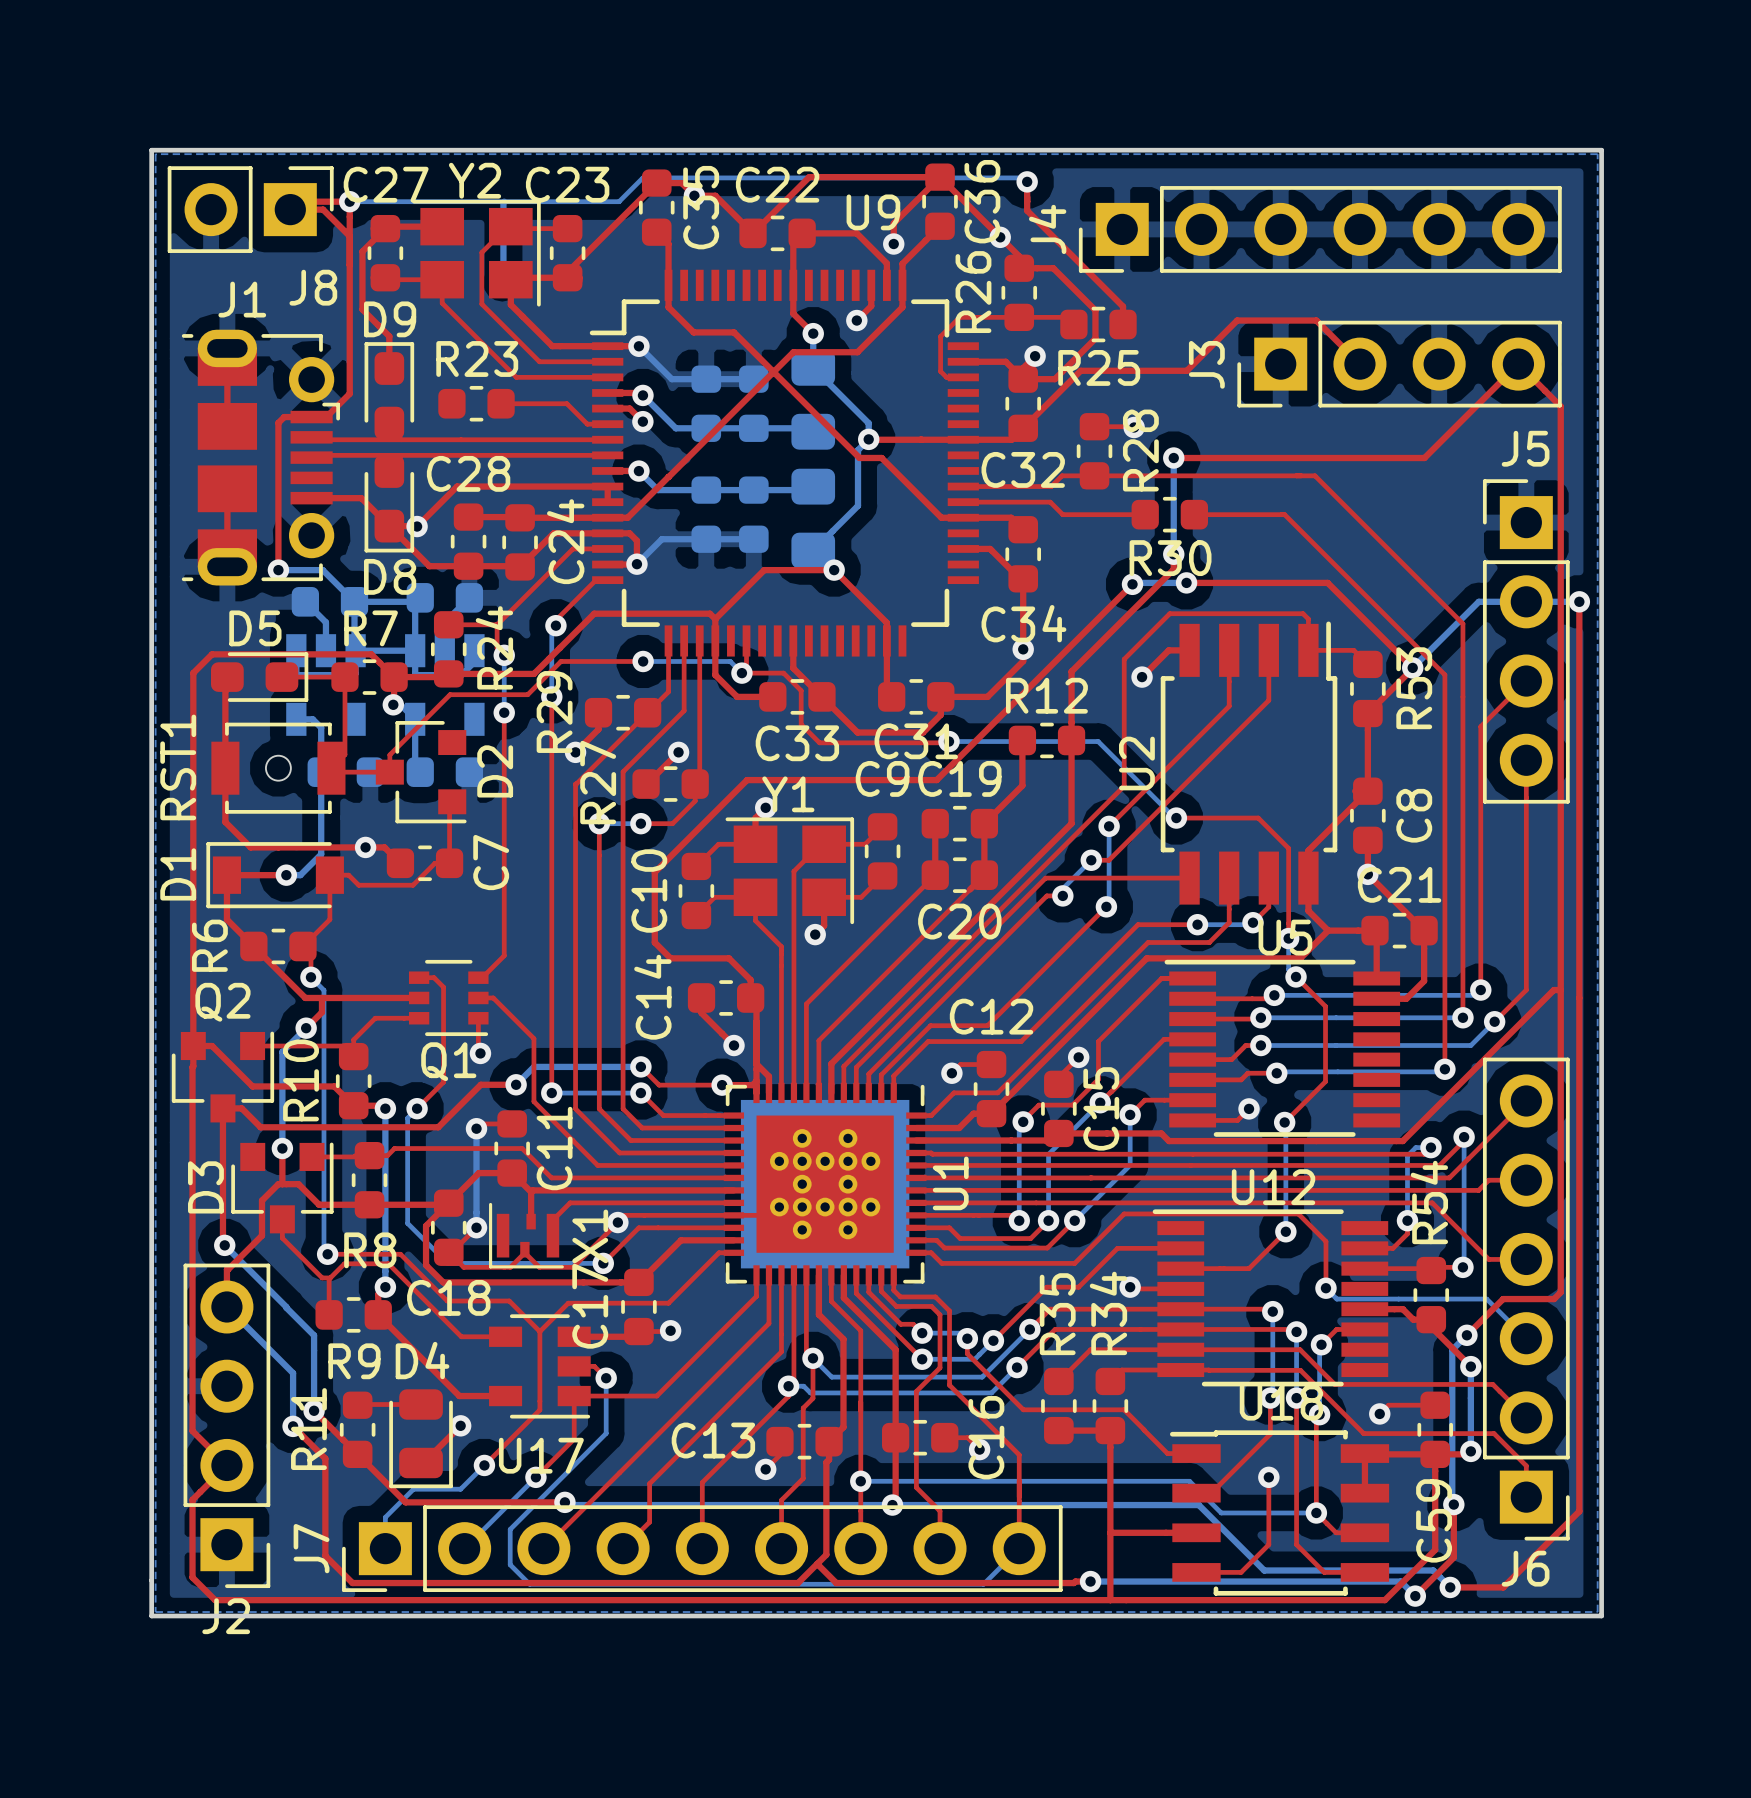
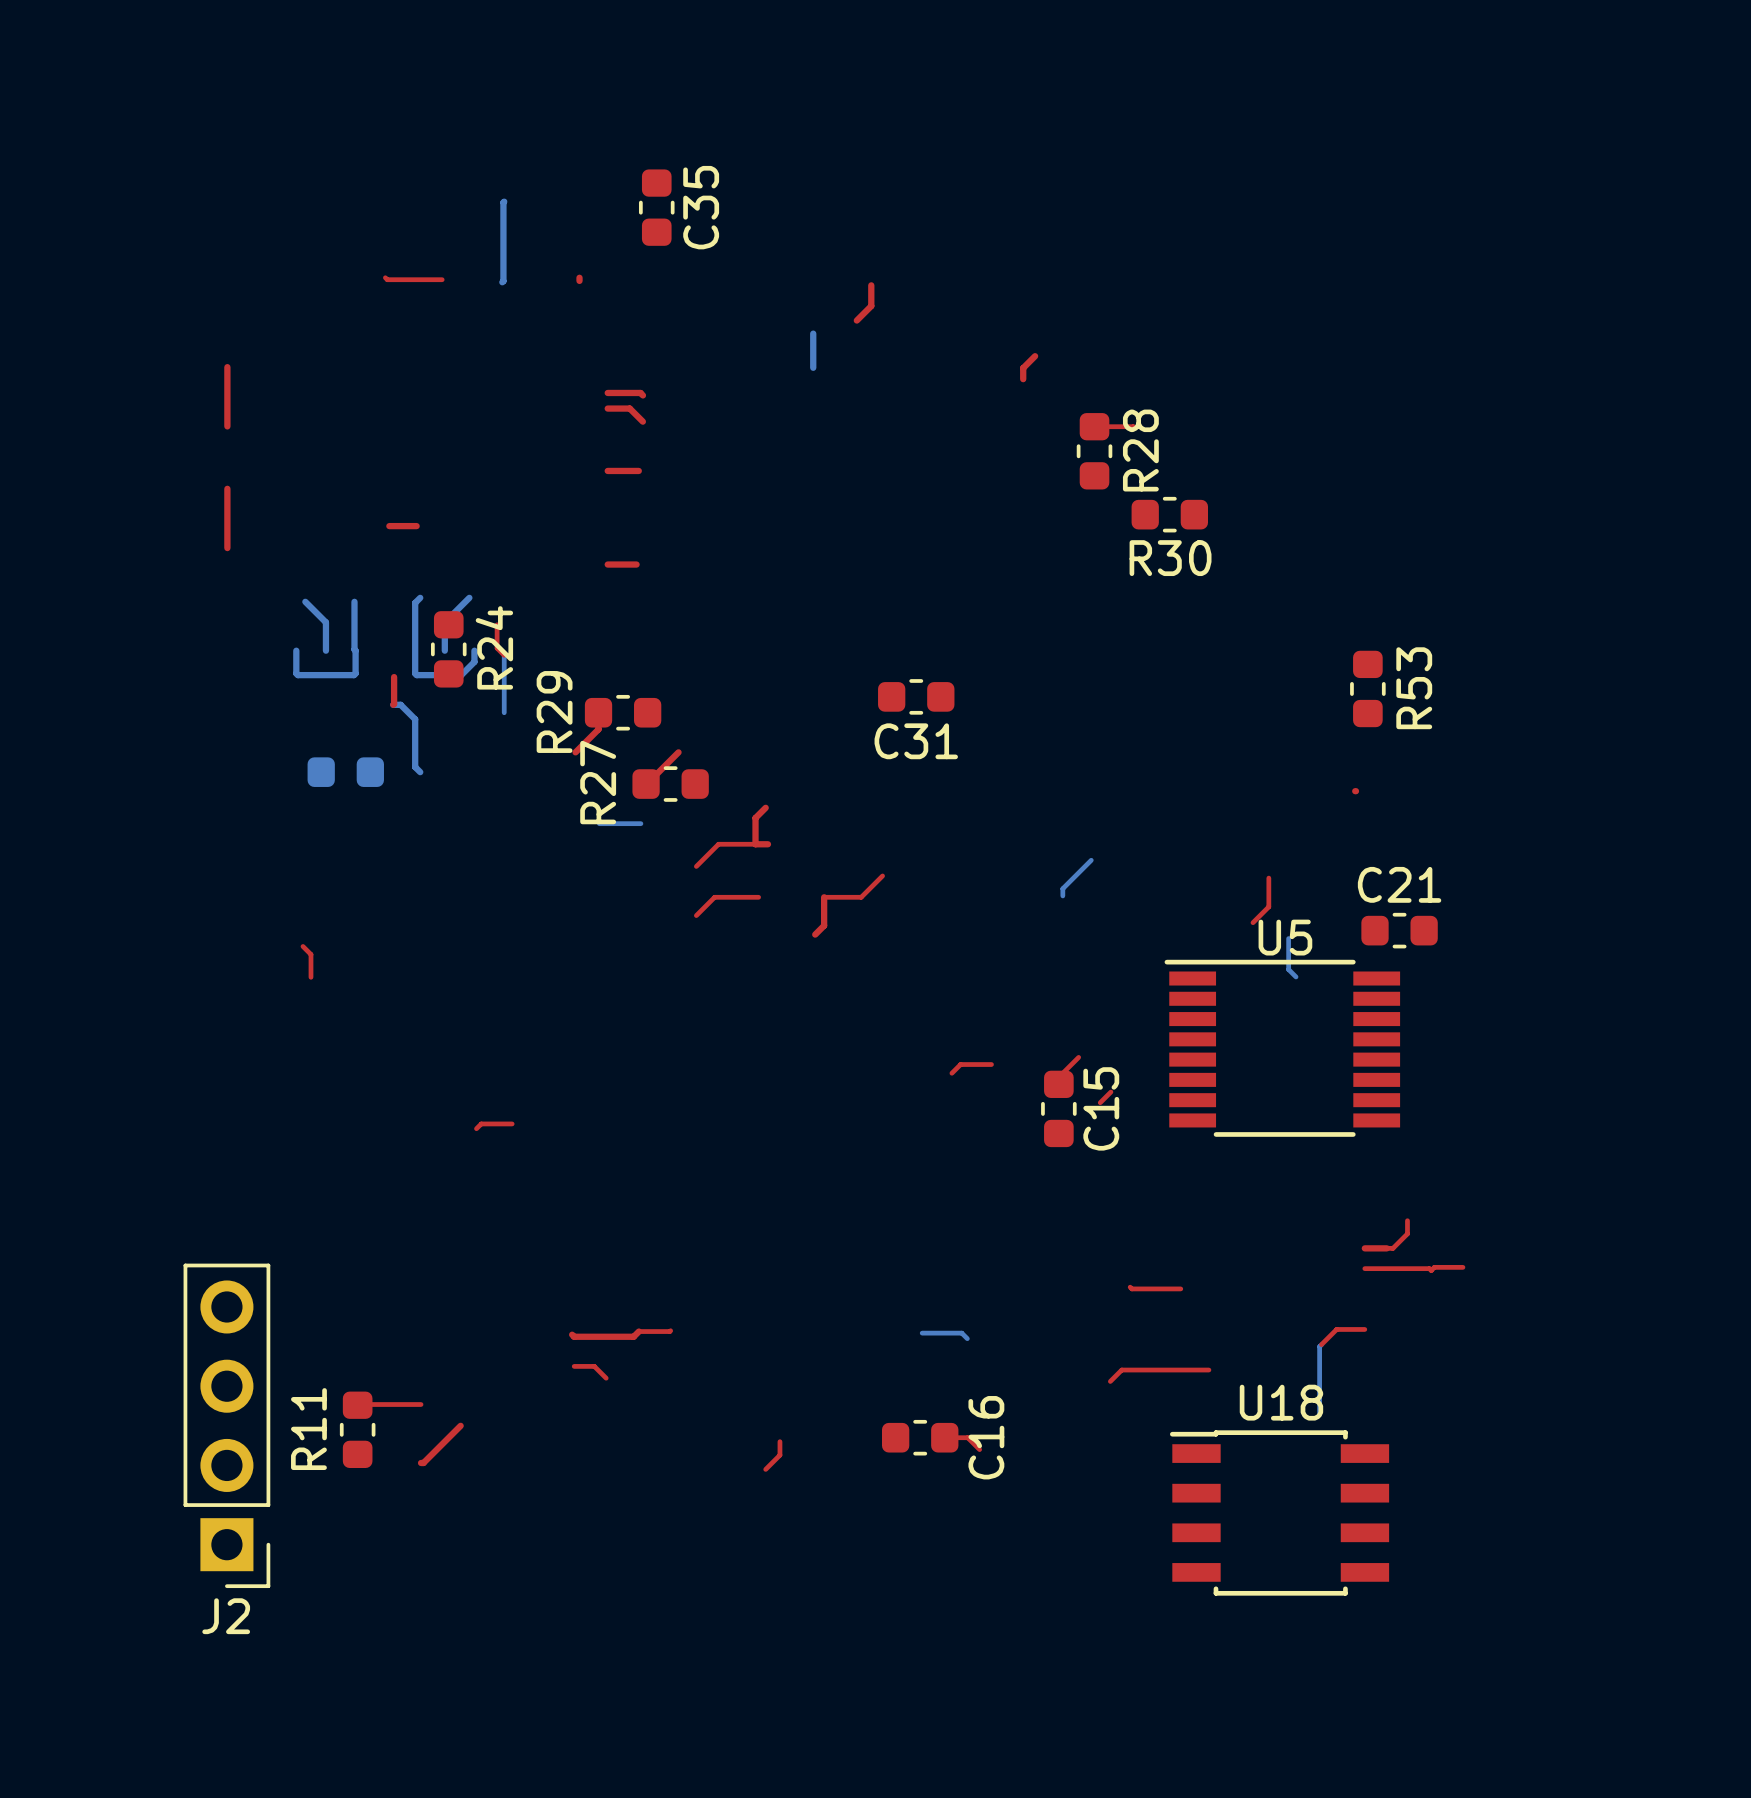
board edge: (151, 150) (1601, 150) (1601, 1615) (151, 1615) (151, 150) -> none
bottom zone outline: (155, 154) (155, 1612) (1597, 1612) (1597, 154) (155, 154) -> none
top track: (940, 177) (809, 177) (753, 233) (715, 195) (694, 195) (681, 183) (656, 183) (567, 272) (567, 277) (512, 277) (510, 279) (510, 304) (552, 346) (638, 346) -> none
top track: (940, 177) (893, 223) (893, 244) -> none
top track: (940, 177) (1019, 256) (1019, 268) (1053, 268) (1095, 310) (1095, 338) (1054, 379) (1023, 379) (1005, 361) (963, 361) -> none
top track: (1027, 181) (1027, 210) (1123, 306) (1123, 324) -> none
bottom track: (1027, 181) (1023, 177) (642, 177) (619, 201) (349, 201) -> none
via: (1027, 181) -> none
via: (694, 195) -> none
via: (349, 201) -> none
C36: (940, 201) -> none
J8: (250, 209) -> none
top track: (442, 226) (387, 226) (362, 251) (362, 309) (389, 336) (389, 368) -> none
top track: (940, 226) (902, 263) (902, 307) (857, 352) (793, 352) (668, 476) -> none
top track: (567, 228) (512, 228) (507, 226) (481, 252) (481, 304) (539, 361) (607, 361) -> none
J4: (1320, 229) -> none
top track: (656, 232) (668, 243) (668, 307) (693, 332) (734, 332) (859, 457) (881, 457) (941, 517) (1011, 517) (1023, 529) -> none
C22: (777, 233) -> none
top track: (349, 236) (323, 209) (290, 209) (298, 201) (349, 201) (349, 393) (326, 417) (284, 417) (278, 422) (278, 570) -> none
via: (1000, 237) -> none
via: (893, 244) -> none
C27: (385, 253) -> none
Y2: (476, 253) -> none
C23: (567, 253) -> none
top track: (440, 277) (442, 279) (442, 303) (516, 377) (607, 377) -> none
top track: (886, 285) (886, 263) (856, 233) (802, 233) (793, 242) (793, 313) (813, 333) -> none
R26: (1019, 292) -> none
via: (856, 320) -> none
top track: (1073, 324) (1066, 317) (959, 317) (940, 336) (940, 371) (946, 377) (963, 377) -> none
R25: (1098, 324) -> none
via: (813, 333) -> none
bottom track: (638, 346) (671, 379) (753, 379) -> none
via: (638, 346) -> none
via: (1035, 356) -> none
bottom track: (817, 363) (813, 367) (868, 423) (868, 439) (858, 450) (858, 505) (813, 550) (834, 570) -> none
top track: (1359, 364) (1316, 320) (1237, 320) (1186, 370) (1080, 370) (1011, 439) (869, 439) -> none
J3: (1399, 364) -> none
D9: (389, 390) -> none
bottom track: (642, 395) (675, 428) (809, 428) (813, 431) -> none
via: (642, 395) -> none
part: (813, 399) -> none
R23: (476, 403) -> none
top track: (501, 403) (566, 403) (587, 424) (607, 424) -> none
part: (706, 403) -> none
part: (753, 403) -> none
C32: (1023, 403) -> none
via: (642, 421) -> none
via: (1134, 427) -> none
top track: (327, 437) (329, 439) (607, 439) -> none
via: (868, 439) -> none
top track: (607, 455) (329, 455) (327, 457) -> none
J1: (260, 457) -> none
top track: (1173, 458) (1424, 458) (1518, 364) (1560, 406) (1560, 1292) (1554, 1299) (1503, 1299) (1466, 1335) -> none
bottom track: (1173, 458) (1173, 554) -> none
via: (1173, 458) -> none
U9: (784, 463) -> none
bottom track: (638, 471) (657, 490) (809, 490) (813, 486) -> none
via: (638, 471) -> none
top track: (668, 476) (627, 517) (607, 517) -> none
top track: (963, 486) (1051, 486) (1062, 475) (1315, 475) (1462, 623) (1462, 1017) -> none
top track: (311, 498) (361, 498) (429, 566) (530, 566) -> none
top track: (607, 502) (607, 486) (457, 486) (417, 526) -> none
top track: (963, 502) (1050, 502) (1062, 514) (1145, 514) -> none
D8: (389, 503) -> none
part: (706, 514) -> none
part: (753, 514) -> none
top track: (1194, 514) (1284, 514) (1444, 674) (1444, 1069) -> none
top track: (480, 517) (595, 517) -> none
part: (813, 518) -> none
via: (417, 526) -> none
bottom track: (753, 539) (661, 539) (636, 564) -> none
C28: (468, 541) -> none
C24: (520, 542) -> none
top track: (607, 548) (572, 548) (497, 624) (448, 624) -> none
top track: (963, 548) (990, 548) (1020, 578) (1023, 578) (1023, 661) (987, 696) (940, 696) (940, 714) (923, 732) (857, 732) (793, 668) (793, 640) -> none
C34: (1023, 554) -> none
top track: (1173, 554) (1173, 569) (1071, 671) (1071, 823) (831, 1063) (831, 1092) -> none
via: (1173, 554) -> none
top track: (636, 564) (636, 540) (629, 533) (553, 533) (520, 566) -> none
via: (636, 564) -> none
bottom track: (278, 570) (322, 570) (354, 601) (416, 601) -> none
via: (278, 570) -> none
via: (834, 570) -> none
top track: (607, 580) (596, 580) (555, 620) (555, 625) -> none
top track: (1186, 582) (1327, 582) (1412, 667) (1367, 713) (1367, 791) (1308, 850) (1308, 910) (1328, 930) -> none
bottom track: (1186, 582) (1132, 584) -> none
via: (1186, 582) -> none
top track: (1132, 584) (936, 780) (747, 780) (654, 872) (654, 942) (670, 958) (728, 958) (750, 980) (750, 997) -> none
via: (1132, 584) -> none
part: (444, 597) -> none
part: (329, 601) -> none
top track: (1579, 601) (1579, 1511) (1503, 1587) (1450, 1587) -> none
bottom track: (1579, 601) (1478, 601) (1412, 667) -> none
via: (1579, 601) -> none
top track: (715, 619) (709, 613) (594, 613) (534, 673) (448, 673) (445, 677) (394, 677) (371, 654) (212, 654) (193, 673) (192, 1431) (226, 1465) -> none
top track: (715, 619) (764, 570) (834, 570) (886, 622) (886, 692) (891, 696) -> none
top track: (715, 619) (715, 675) (737, 696) (772, 696) -> none
bottom track: (555, 625) (551, 629) (551, 696) -> none
via: (555, 625) -> none
top track: (668, 640) (668, 691) (575, 784) (575, 1108) (619, 1152) (733, 1152) -> none
top track: (684, 640) (684, 710) (623, 771) (623, 1108) (642, 1128) (733, 1128) -> none
top track: (699, 640) (699, 779) (695, 784) (695, 801) (672, 823) (640, 823) -> none
top track: (746, 640) (746, 668) (741, 673) (783, 673) (801, 690) (801, 724) (819, 742) (949, 741) -> none
J5: (1526, 641) -> none
via: (1023, 649) -> none
bottom track: (355, 650) (415, 650) -> none
top track: (1189, 650) (1168, 650) (1142, 677) -> none
top track: (1229, 650) (1229, 706) (1109, 826) -> none
top track: (1269, 651) (1268, 700) (1108, 860) (1091, 860) -> none
via: (504, 655) -> none
top track: (643, 661) (560, 661) (527, 694) (450, 694) (389, 754) (389, 772) (335, 772) (331, 768) (344, 754) (344, 677) (282, 677) -> none
bottom track: (643, 661) (730, 661) (741, 673) -> none
via: (643, 661) -> none
top track: (1367, 664) (1353, 650) (1308, 650) (1308, 619) (1303, 613) (1169, 613) (1124, 659) (1124, 786) (843, 1066) (843, 1092) -> none
via: (1412, 667) -> none
via: (741, 673) -> none
D5: (259, 677) -> none
R7: (369, 677) -> none
via: (1142, 677) -> none
top track: (1526, 681) (1480, 726) (1480, 990) -> none
part: (325, 685) -> none
part: (444, 685) -> none
top track: (227, 689) (227, 677) (225, 679) (225, 822) (250, 847) (384, 847) (400, 863) -> none
top track: (551, 696) (551, 1093) -> none
via: (551, 696) -> none
C33: (797, 696) -> none
via: (393, 704) -> none
via: (504, 712) -> none
top track: (502, 714) (504, 712) (504, 955) (482, 977) (478, 977) -> none
bottom track: (296, 719) (312, 719) (321, 727) (321, 854) (300, 875) (286, 875) -> none
top track: (1022, 740) (1022, 785) (984, 823) (984, 877) -> none
R12: (1046, 740) -> none
bottom track: (949, 741) (1098, 741) (1176, 818) -> none
via: (949, 741) -> none
via: (575, 752) -> none
via: (678, 752) -> none
top track: (1526, 760) (1526, 990) (1494, 1021) -> none
U2: (1249, 763) -> none
RST1: (278, 768) -> none
D2: (421, 772) -> none
part: (444, 772) -> none
top track: (452, 801) (449, 804) (449, 863) (434, 863) (413, 885) (358, 885) (348, 875) (329, 875) -> none
via: (765, 807) -> none
C8: (1367, 815) -> none
top track: (1176, 818) (1258, 818) (1288, 848) (1288, 938) -> none
via: (1176, 818) -> none
top track: (599, 823) (599, 1108) (630, 1140) (733, 1140) -> none
via: (599, 823) -> none
via: (640, 823) -> none
top track: (935, 823) (935, 875) (806, 1004) (806, 1092) -> none
C19: (959, 823) -> none
top track: (882, 826) (865, 844) (821, 844) (793, 871) (793, 1092) -> none
bottom track: (1109, 826) (1109, 904) (1106, 906) -> none
via: (1109, 826) -> none
top track: (1367, 840) (1367, 874) (1424, 930) (1424, 981) (1406, 998) (1376, 998) -> none
via: (365, 847) -> none
C9: (882, 851) -> none
via: (1091, 860) -> none
C7: (425, 863) -> none
top track: (329, 870) (329, 919) (302, 946) (310, 946) -> none
Y1: (789, 870) -> none
via: (1367, 874) -> none
D1: (275, 875) -> none
top track: (286, 875) (226, 875) (226, 919) (305, 997) (419, 997) -> none
via: (286, 875) -> none
C20: (959, 875) -> none
top track: (984, 875) (818, 1040) (818, 1092) -> none
top track: (1189, 878) (1045, 878) (856, 1067) (856, 1092) -> none
top track: (1229, 878) (1229, 922) (1209, 942) (1148, 942) (997, 1092) (953, 1092) (931, 1115) (916, 1115) -> none
C10: (696, 891) -> none
top track: (1062, 895) (1046, 895) (868, 1073) (868, 1092) -> none
via: (1062, 895) -> none
top track: (755, 897) (755, 920) (781, 946) (781, 1092) -> none
top track: (1106, 906) (987, 1025) (930, 1025) (881, 1074) (881, 1092) -> none
via: (1106, 906) -> none
bottom track: (1252, 922) (1251, 924) (1197, 924) -> none
via: (1252, 922) -> none
top track: (1197, 924) (1138, 924) (1021, 1041) (928, 1041) (893, 1075) (893, 1092) -> none
via: (1197, 924) -> none
top track: (1328, 930) (1375, 930) (1376, 932) (1376, 978) -> none
top track: (1328, 930) (1300, 958) (1146, 958) (991, 1113) -> none
via: (815, 934) -> none
via: (1288, 938) -> none
R6: (278, 946) -> none
top track: (1296, 976) (1325, 1006) (1325, 1081) (1284, 1122) -> none
via: (1296, 976) -> none
via: (310, 977) -> none
top track: (419, 977) (434, 977) (443, 987) (443, 1082) (417, 1108) -> none
top track: (1192, 978) (1161, 978) (1098, 1041) (1098, 1079) (1072, 1105) (1038, 1105) (1019, 1124) -> none
bottom track: (310, 985) (310, 977) (323, 990) (323, 1250) (327, 1254) -> none
bottom track: (1480, 990) (1475, 995) (1274, 995) -> none
via: (1480, 990) -> none
top track: (1560, 990) (1553, 990) (1402, 1141) (1168, 1141) (1161, 1133) (1058, 1133) -> none
top track: (1274, 995) (1270, 998) (1192, 998) -> none
via: (1274, 995) -> none
top track: (322, 997) (322, 1012) (306, 1028) -> none
Q1: (448, 997) -> none
top track: (478, 997) (493, 997) (533, 1038) (533, 1101) (597, 1165) (733, 1165) -> none
top track: (701, 997) (701, 1013) (734, 1045) -> none
C14: (726, 997) -> none
top track: (756, 1003) (756, 1092) -> none
top track: (1260, 1017) (1192, 1019) -> none
bottom track: (1260, 1017) (1462, 1017) -> none
via: (1260, 1017) -> none
via: (1462, 1017) -> none
top track: (419, 1018) (375, 1018) (353, 1039) (353, 1056) -> none
top track: (478, 1018) (478, 1051) (480, 1053) -> none
bottom track: (1494, 1021) (1470, 1045) (1260, 1045) -> none
via: (1494, 1021) -> none
bottom track: (306, 1028) (282, 1051) (282, 1148) -> none
via: (306, 1028) -> none
top track: (1192, 1039) (1164, 1039) (1111, 1092) -> none
via: (734, 1045) -> none
top track: (1260, 1045) (1245, 1045) (1231, 1059) (1192, 1059) -> none
via: (1260, 1045) -> none
top track: (193, 1046) (212, 1046) (252, 1086) (334, 1086) (353, 1105) (382, 1105) (385, 1108) -> none
top track: (252, 1046) (343, 1046) (353, 1056) -> none
via: (480, 1053) -> none
via: (1078, 1057) -> none
top track: (756, 1064) (768, 1076) (768, 1092) -> none
top track: (640, 1066) (659, 1085) (752, 1085) (756, 1081) -> none
bottom track: (640, 1066) (534, 1066) (516, 1084) -> none
via: (640, 1066) -> none
bottom track: (1444, 1069) (1442, 1071) (1276, 1073) -> none
via: (1444, 1069) -> none
via: (951, 1073) -> none
top track: (1276, 1073) (1247, 1073) (1241, 1079) (1192, 1079) -> none
via: (1276, 1073) -> none
Q2: (222, 1077) -> none
R10: (353, 1081) -> none
top track: (516, 1084) (480, 1084) (438, 1127) (260, 1127) (241, 1108) (222, 1108) (222, 1243) (224, 1245) -> none
via: (516, 1084) -> none
via: (722, 1085) -> none
C12: (991, 1089) -> none
bottom track: (551, 1093) (640, 1093) -> none
via: (551, 1093) -> none
top track: (640, 1093) (663, 1115) (733, 1115) -> none
via: (640, 1093) -> none
top track: (1192, 1100) (1144, 1100) (1130, 1114) -> none
top track: (1526, 1100) (1449, 1177) (916, 1177) -> none
bottom track: (1100, 1102) (1048, 1154) (1048, 1220) -> none
via: (1100, 1102) -> none
bottom track: (385, 1108) (385, 1287) -> none
via: (385, 1108) -> none
bottom track: (417, 1108) (407, 1118) (407, 1223) (447, 1263) (603, 1263) -> none
via: (417, 1108) -> none
top track: (1249, 1108) (1237, 1120) (1192, 1120) -> none
via: (1249, 1108) -> none
top track: (993, 1113) (973, 1113) (959, 1128) (916, 1128) -> none
bottom track: (1130, 1114) (1130, 1165) (1074, 1220) -> none
via: (1130, 1114) -> none
bottom track: (1023, 1121) (1019, 1125) (1019, 1220) -> none
via: (1023, 1121) -> none
bottom track: (1284, 1122) (1285, 1231) -> none
via: (1284, 1122) -> none
bottom track: (476, 1128) (476, 1227) -> none
via: (476, 1128) -> none
top track: (1464, 1137) (1464, 1140) (1439, 1165) (916, 1165) -> none
bottom track: (1464, 1137) (1462, 1267) -> none
via: (1464, 1137) -> none
top track: (916, 1140) (1046, 1140) -> none
top track: (1430, 1147) (1424, 1154) (916, 1152) -> none
bottom track: (1430, 1147) (1415, 1147) (1407, 1155) (1407, 1220) -> none
via: (1430, 1147) -> none
via: (282, 1148) -> none
C11: (512, 1148) -> none
top track: (286, 1152) (282, 1148) (282, 1184) -> none
top track: (355, 1155) (387, 1155) (394, 1148) (522, 1148) (551, 1177) (733, 1177) -> none
top track: (369, 1155) (312, 1156) -> none
R8: (369, 1180) -> none
top track: (1526, 1180) (1488, 1180) (1478, 1190) (916, 1190) -> none
top track: (825, 1184) (793, 1215) (625, 1215) (573, 1267) (539, 1267) (524, 1252) -> none
U1: (825, 1184) -> none
D3: (282, 1187) -> none
top track: (733, 1190) (532, 1190) (531, 1192) -> none
top track: (531, 1192) (512, 1173) (478, 1173) (426, 1225) (426, 1265) (443, 1282) (638, 1282) (681, 1240) (733, 1240) -> none
top track: (531, 1192) (531, 1221) -> none
top track: (733, 1202) (570, 1202) (552, 1220) (552, 1235) -> none
top track: (916, 1202) (1432, 1202) (1488, 1259) (1526, 1259) -> none
top track: (447, 1204) (319, 1204) (298, 1184) (278, 1184) (262, 1200) (262, 1235) (226, 1269) (226, 1306) -> none
top track: (916, 1215) (1013, 1215) (1019, 1220) -> none
top track: (282, 1219) (282, 1238) (322, 1277) (330, 1277) -> none
via: (1019, 1220) -> none
top track: (1048, 1220) (1030, 1238) (960, 1238) (949, 1227) (916, 1227) -> none
via: (1048, 1220) -> none
top track: (1074, 1220) (1047, 1248) (944, 1248) (936, 1240) (916, 1240) -> none
via: (1074, 1220) -> none
via: (1407, 1220) -> none
via: (617, 1222) -> none
C18: (448, 1227) -> none
top track: (476, 1227) (451, 1252) (448, 1252) (463, 1267) (510, 1267) (524, 1252) -> none
via: (476, 1227) -> none
top track: (733, 1227) (638, 1227) (603, 1263) -> none
top track: (1285, 1231) (1248, 1268) (1180, 1268) -> none
via: (1285, 1231) -> none
X1: (526, 1235) -> none
bottom track: (224, 1245) (314, 1335) (314, 1410) -> none
via: (224, 1245) -> none
top track: (1180, 1248) (1117, 1248) (1078, 1287) (1046, 1287) (993, 1340) -> none
top track: (733, 1252) (718, 1252) (668, 1303) (568, 1303) (539, 1331) -> none
top track: (916, 1252) (931, 1252) (941, 1263) (1074, 1263) (1124, 1213) (1298, 1213) (1325, 1241) (1325, 1288) -> none
top track: (327, 1254) (400, 1254) (447, 1301) (509, 1301) (539, 1331) -> none
via: (327, 1254) -> none
via: (603, 1263) -> none
via: (1462, 1267) -> none
top track: (756, 1275) (756, 1296) (656, 1396) (574, 1396) (574, 1439) (535, 1477) -> none
top track: (768, 1275) (768, 1323) (543, 1548) (543, 1524) -> none
top track: (781, 1275) (781, 1351) (649, 1483) (649, 1522) (623, 1548) -> none
top track: (793, 1275) (793, 1380) (788, 1386) (788, 1396) (702, 1482) (702, 1548) -> none
top track: (806, 1275) (806, 1351) (813, 1358) (813, 1398) (803, 1408) (803, 1478) (781, 1500) (781, 1548) -> none
top track: (818, 1275) (818, 1314) (843, 1339) (843, 1427) (829, 1441) (829, 1459) (826, 1462) (826, 1554) (798, 1583) (352, 1583) (325, 1555) (325, 1458) (293, 1426) -> none
top track: (831, 1275) (831, 1301) (860, 1330) (860, 1548) -> none
top track: (843, 1275) (843, 1297) (895, 1349) (895, 1501) (892, 1505) -> none
top track: (856, 1275) (856, 1293) (922, 1359) -> none
top track: (868, 1275) (868, 1292) (900, 1324) (913, 1324) (922, 1333) -> none
top track: (881, 1275) (881, 1291) (896, 1306) (931, 1306) (940, 1314) (940, 1367) (916, 1391) (916, 1487) (940, 1511) (940, 1548) (923, 1532) -> none
top track: (893, 1275) (893, 1290) (900, 1296) (935, 1296) (949, 1310) (949, 1385) (1019, 1454) (1019, 1548) -> none
top track: (385, 1287) (378, 1294) (378, 1314) (459, 1396) (505, 1396) -> none
via: (385, 1287) -> none
via: (1130, 1287) -> none
bottom track: (1325, 1288) (1336, 1299) (1486, 1299) (1526, 1338) -> none
via: (1325, 1288) -> none
R54: (1431, 1295) -> none
U12: (1270, 1297) -> none
J6: (1526, 1299) -> none
bottom track: (226, 1306) (293, 1373) (293, 1426) -> none
C17: (638, 1306) -> none
top track: (1364, 1309) (1402, 1309) (1413, 1319) (1431, 1319) -> none
top track: (1272, 1311) (1270, 1309) (1050, 1309) (1029, 1329) -> none
via: (1272, 1311) -> none
top track: (329, 1314) (329, 1279) (344, 1263) (388, 1263) (461, 1336) (505, 1336) -> none
R9: (353, 1314) -> none
bottom track: (1276, 1315) (1272, 1311) (1272, 1395) (1270, 1398) -> none
top track: (1431, 1319) (1431, 1327) (1470, 1366) -> none
bottom track: (1029, 1329) (982, 1377) (831, 1377) (813, 1358) -> none
via: (1029, 1329) -> none
via: (670, 1330) -> none
top track: (539, 1331) (539, 1409) (484, 1465) -> none
top track: (1296, 1331) (1294, 1329) (1055, 1329) (1017, 1367) -> none
via: (1296, 1331) -> none
via: (922, 1333) -> none
bottom track: (1466, 1335) (1452, 1349) (1452, 1503) (1453, 1504) -> none
via: (1466, 1335) -> none
bottom track: (1301, 1337) (1296, 1331) (1296, 1398) -> none
top track: (967, 1338) (967, 1353) (1023, 1409) (1124, 1409) (1144, 1429) -> none
via: (967, 1338) -> none
bottom track: (993, 1340) (974, 1359) (922, 1359) -> none
via: (993, 1340) -> none
via: (1321, 1344) -> none
via: (813, 1358) -> none
via: (922, 1359) -> none
U17: (539, 1366) -> none
bottom track: (1470, 1366) (1470, 1451) -> none
via: (1470, 1366) -> none
bottom track: (1017, 1367) (991, 1392) (810, 1392) (803, 1386) (788, 1386) -> none
via: (1017, 1367) -> none
top track: (1209, 1370) (1300, 1370) (1363, 1433) (1494, 1433) (1526, 1465) (1526, 1497) -> none
bottom track: (606, 1378) (606, 1433) (510, 1529) (510, 1564) (529, 1584) (983, 1584) (1019, 1548) -> none
via: (606, 1378) -> none
top track: (1058, 1381) (1090, 1349) (1300, 1349) (1334, 1384) (1492, 1384) (1526, 1417) (1506, 1417) -> none
via: (788, 1386) -> none
top track: (1270, 1398) (1270, 1434) (1211, 1493) (1196, 1493) -> none
via: (1270, 1398) -> none
top track: (1296, 1398) (1296, 1544) (1324, 1572) (1364, 1572) -> none
via: (1296, 1398) -> none
top track: (1435, 1405) (1388, 1405) (1379, 1413) -> none
R35: (1058, 1406) -> none
R34: (1110, 1406) -> none
top track: (314, 1410) (405, 1502) (564, 1502) -> none
via: (314, 1410) -> none
via: (1379, 1413) -> none
top track: (1319, 1414) (1316, 1417) (1316, 1512) (1336, 1532) (1364, 1532) -> none
via: (1319, 1414) -> none
via: (460, 1425) -> none
via: (293, 1426) -> none
C59: (1435, 1429) -> none
top track: (1058, 1430) (1110, 1430) (1110, 1600) -> none
top track: (1144, 1430) (1167, 1453) (1196, 1453) -> none
D4: (421, 1438) -> none
C13: (804, 1441) -> none
via: (979, 1449) -> none
top track: (1470, 1451) (1467, 1454) (1364, 1453) (1364, 1493) -> none
via: (1470, 1451) -> none
top track: (1435, 1454) (1435, 1549) (1384, 1600) (215, 1600) (192, 1577) (192, 1499) (226, 1465) -> none
bottom track: (484, 1465) (460, 1489) (413, 1489) (385, 1517) (385, 1548) (382, 1548) -> none
via: (484, 1465) -> none
via: (765, 1469) -> none
bottom track: (535, 1477) (464, 1548) -> none
via: (535, 1477) -> none
top track: (1268, 1477) (1268, 1544) (1241, 1572) (1196, 1572) -> none
via: (1268, 1477) -> none
bottom track: (860, 1481) (1189, 1481) (1221, 1512) (1316, 1512) -> none
via: (860, 1481) -> none
bottom track: (564, 1502) (567, 1505) (1198, 1505) (1264, 1570) (1433, 1570) (1450, 1587) -> none
via: (564, 1502) -> none
top track: (1453, 1504) (1453, 1557) (1415, 1596) -> none
via: (1453, 1504) -> none
via: (892, 1505) -> none
via: (1316, 1512) -> none
top track: (1110, 1532) (1196, 1532) -> none
J7: (702, 1548) -> none
top track: (817, 1563) (836, 1583) (1090, 1581) -> none
bottom track: (1090, 1581) (1400, 1581) (1415, 1596) -> none
via: (1090, 1581) -> none
via: (1450, 1587) -> none
via: (1415, 1596) -> none

